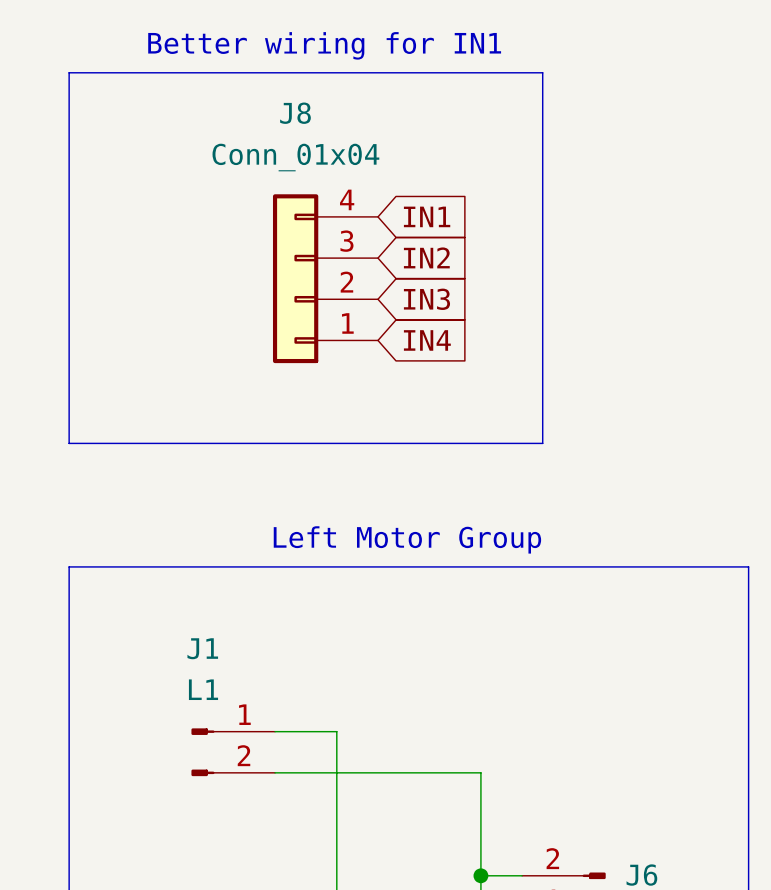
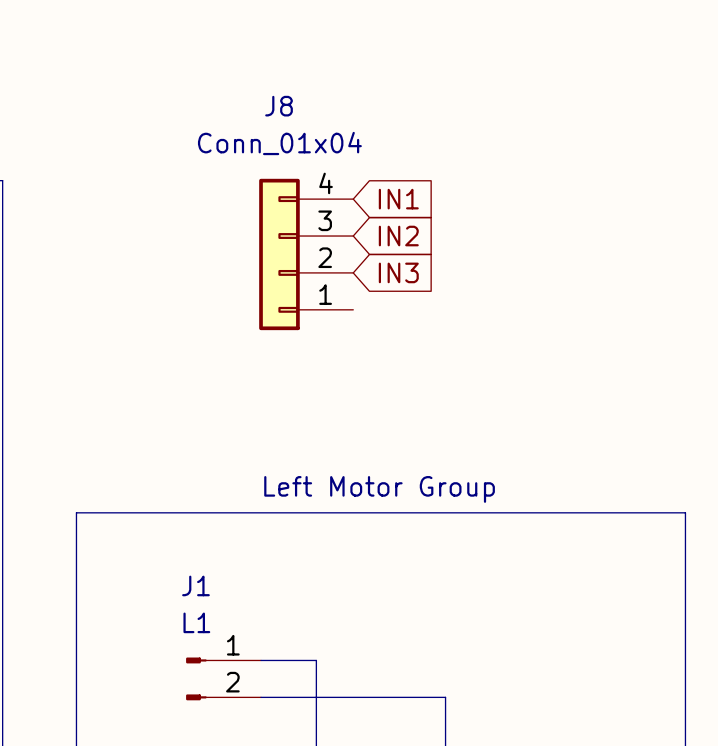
text: Better wiring for IN1 (324, 45) -> none
line: (69, 72) (69, 443) (542, 443) (542, 72) (69, 72) -> none
global label: IN4 (427, 340) -> none

